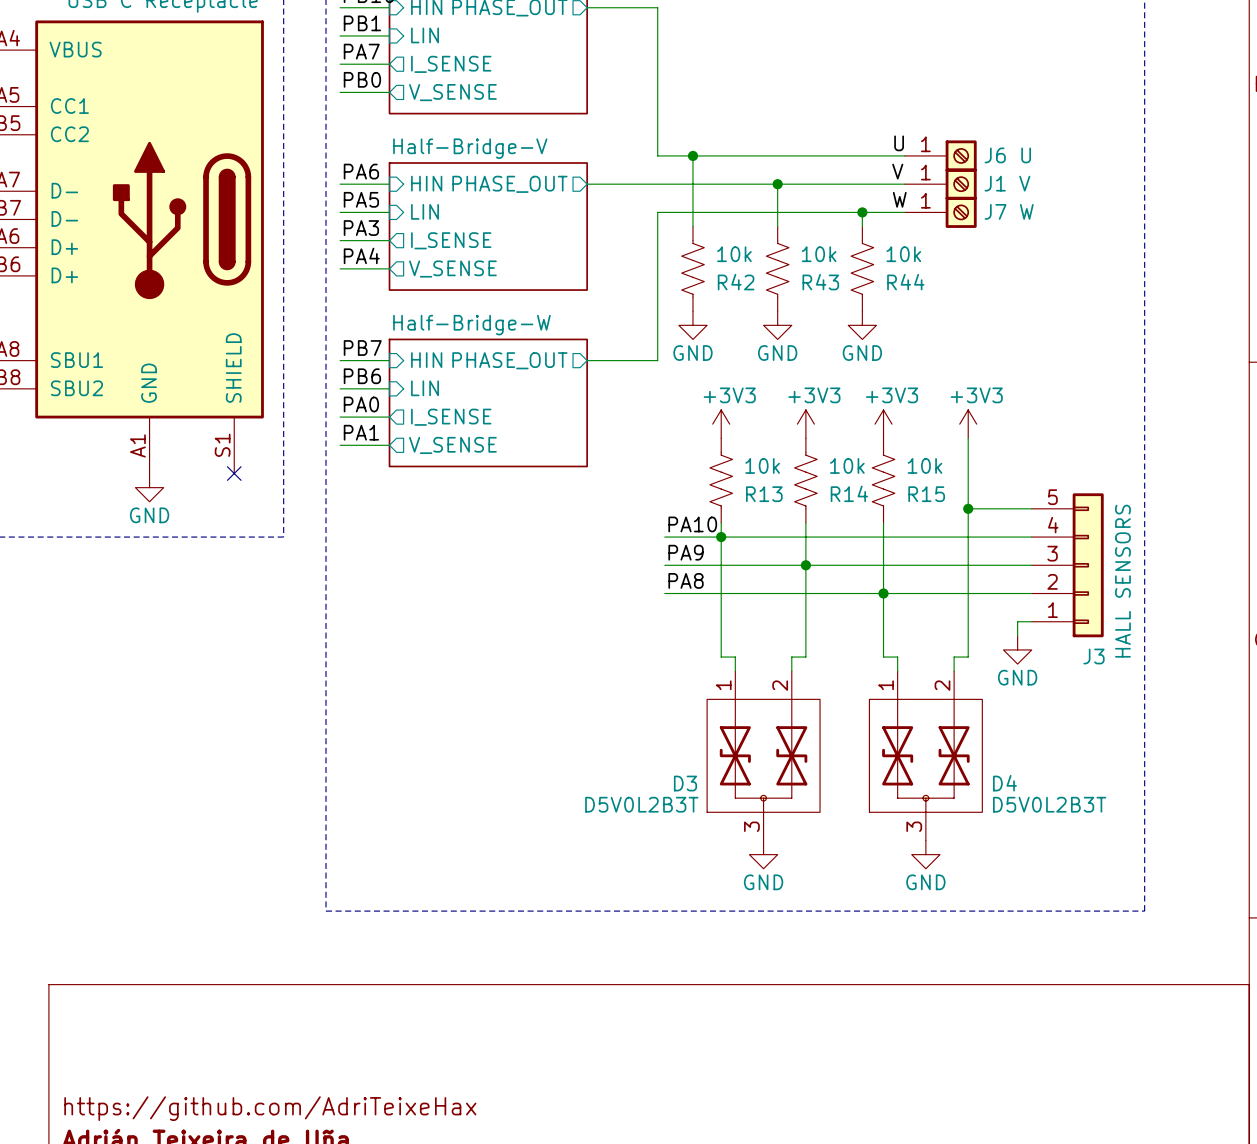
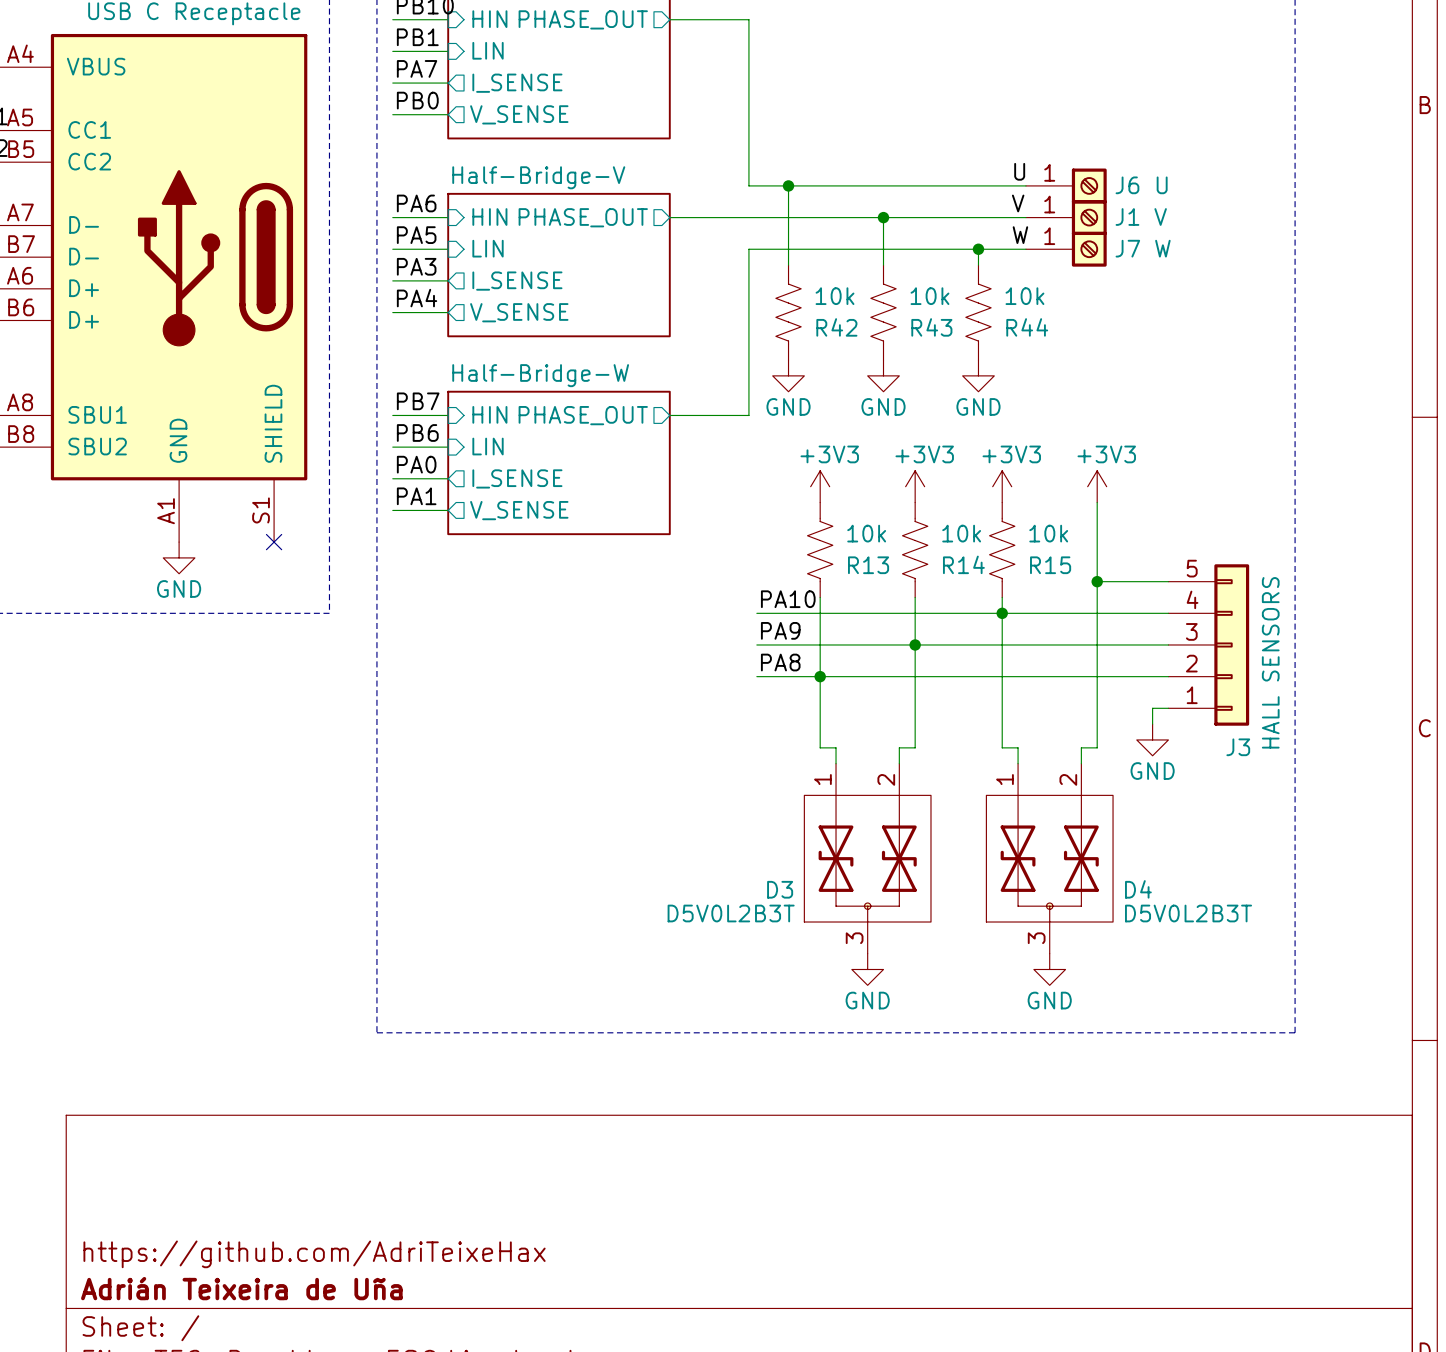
junction position: (721, 537) -> (820, 676)
junction position: (883, 593) -> (1002, 613)

